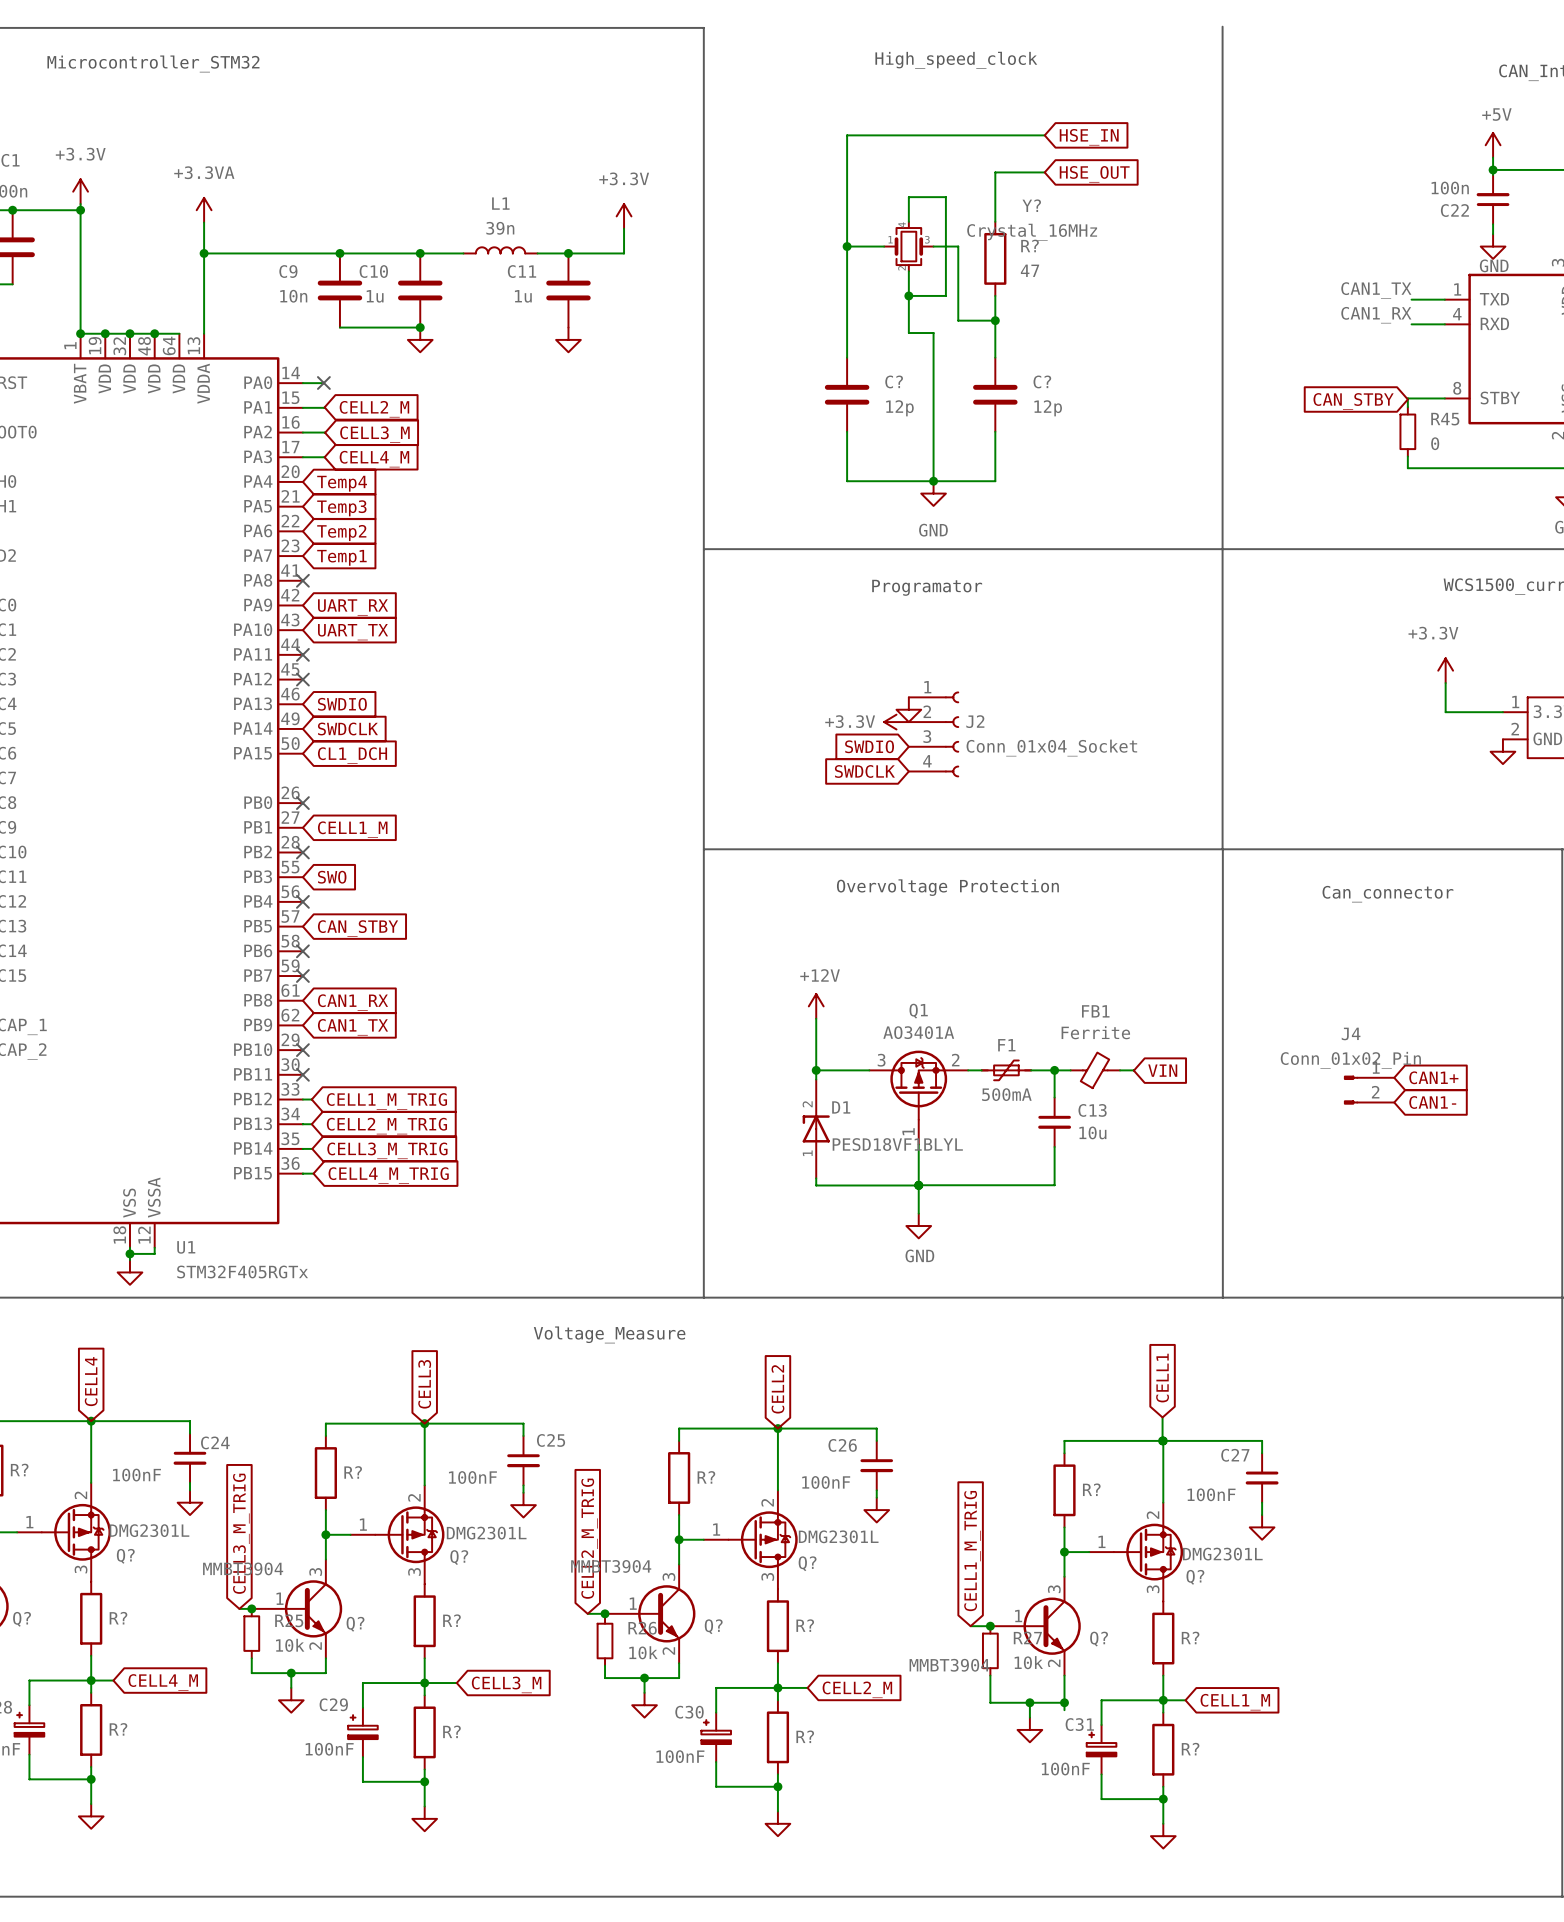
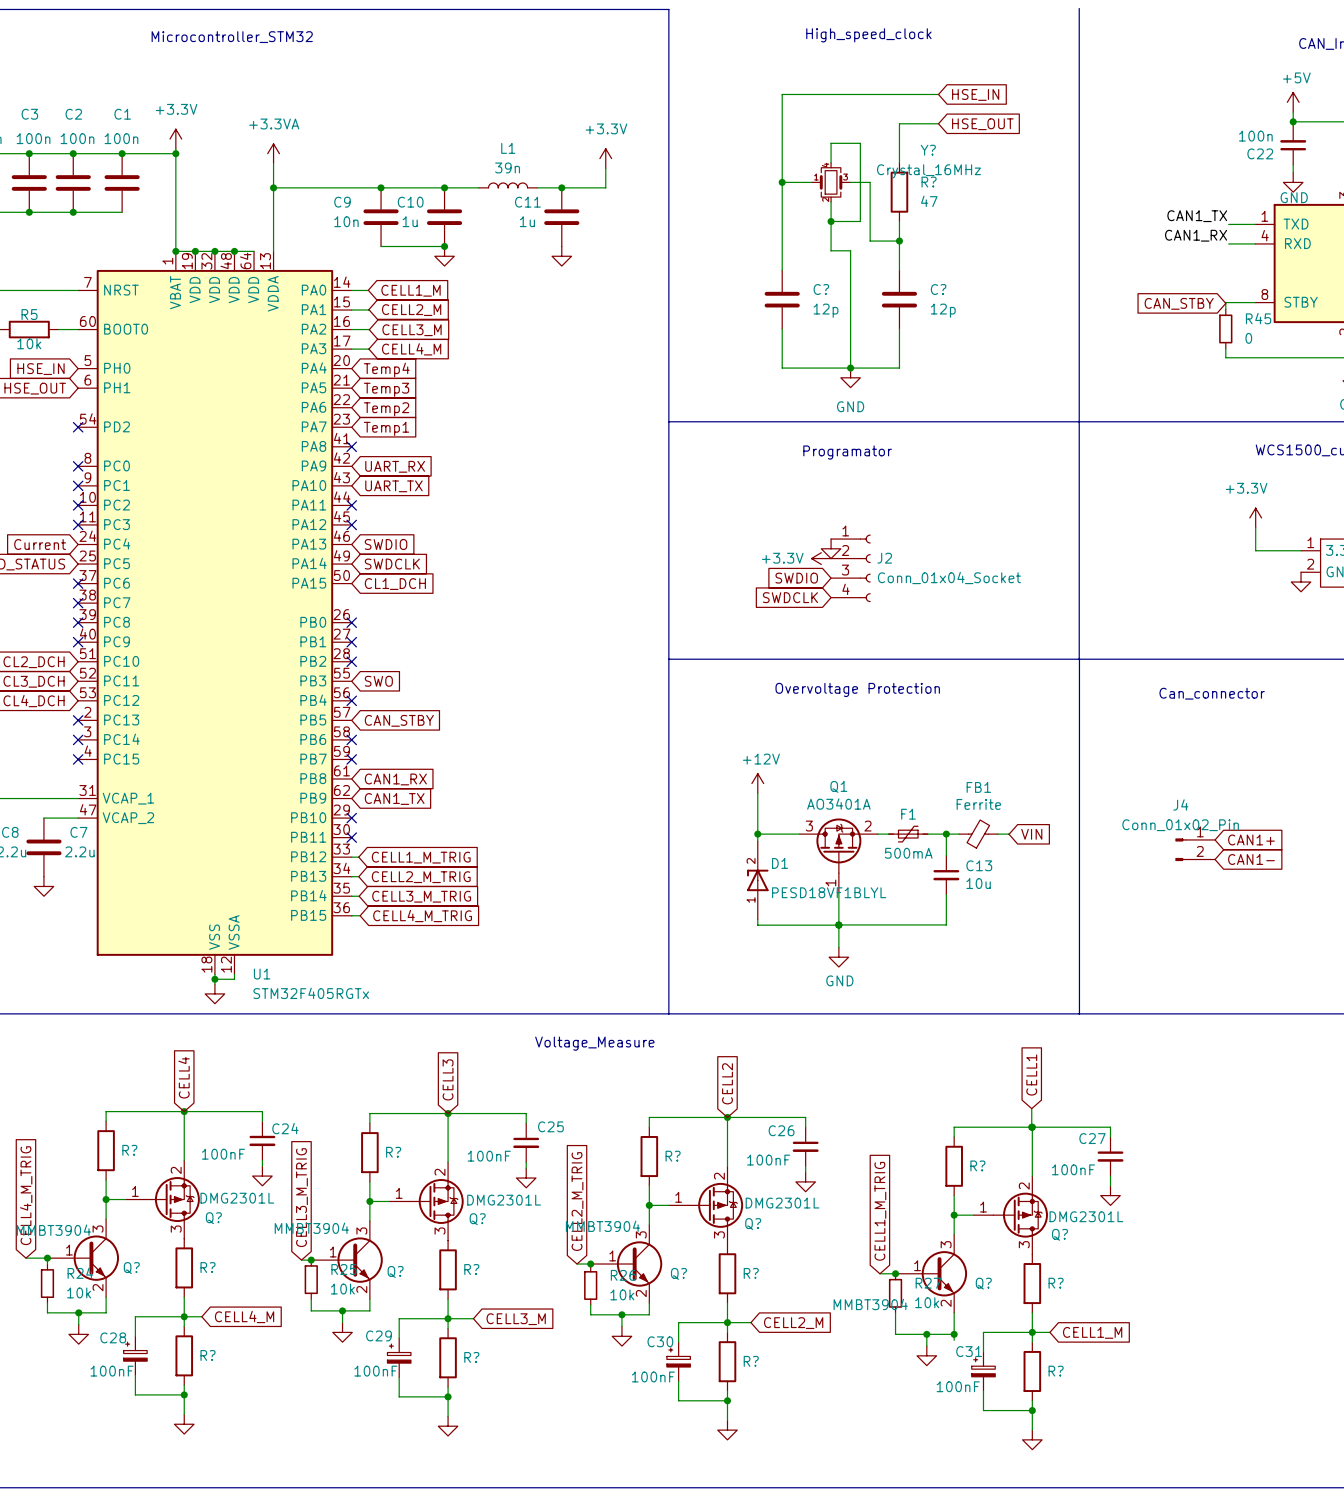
no-connect mark: (323, 382) -> none
global label: none -> CELL1_M (411, 290)
no-connect mark: none -> (351, 642)
global label: CELL1_M (352, 829) -> none

